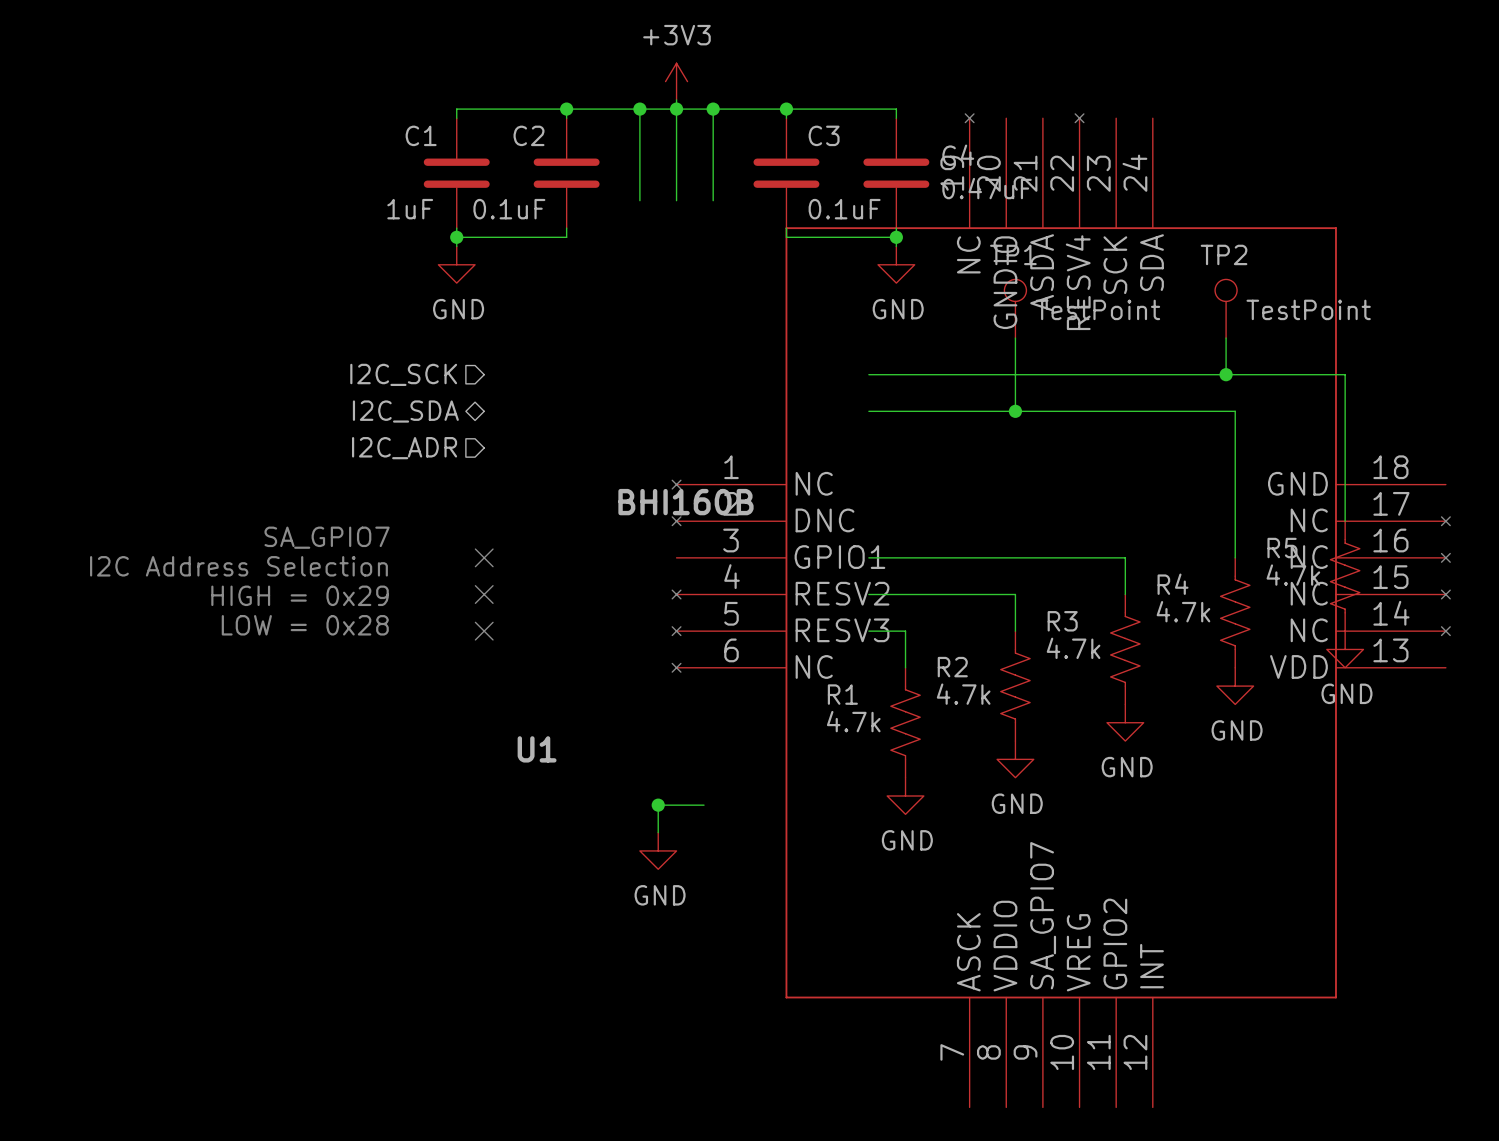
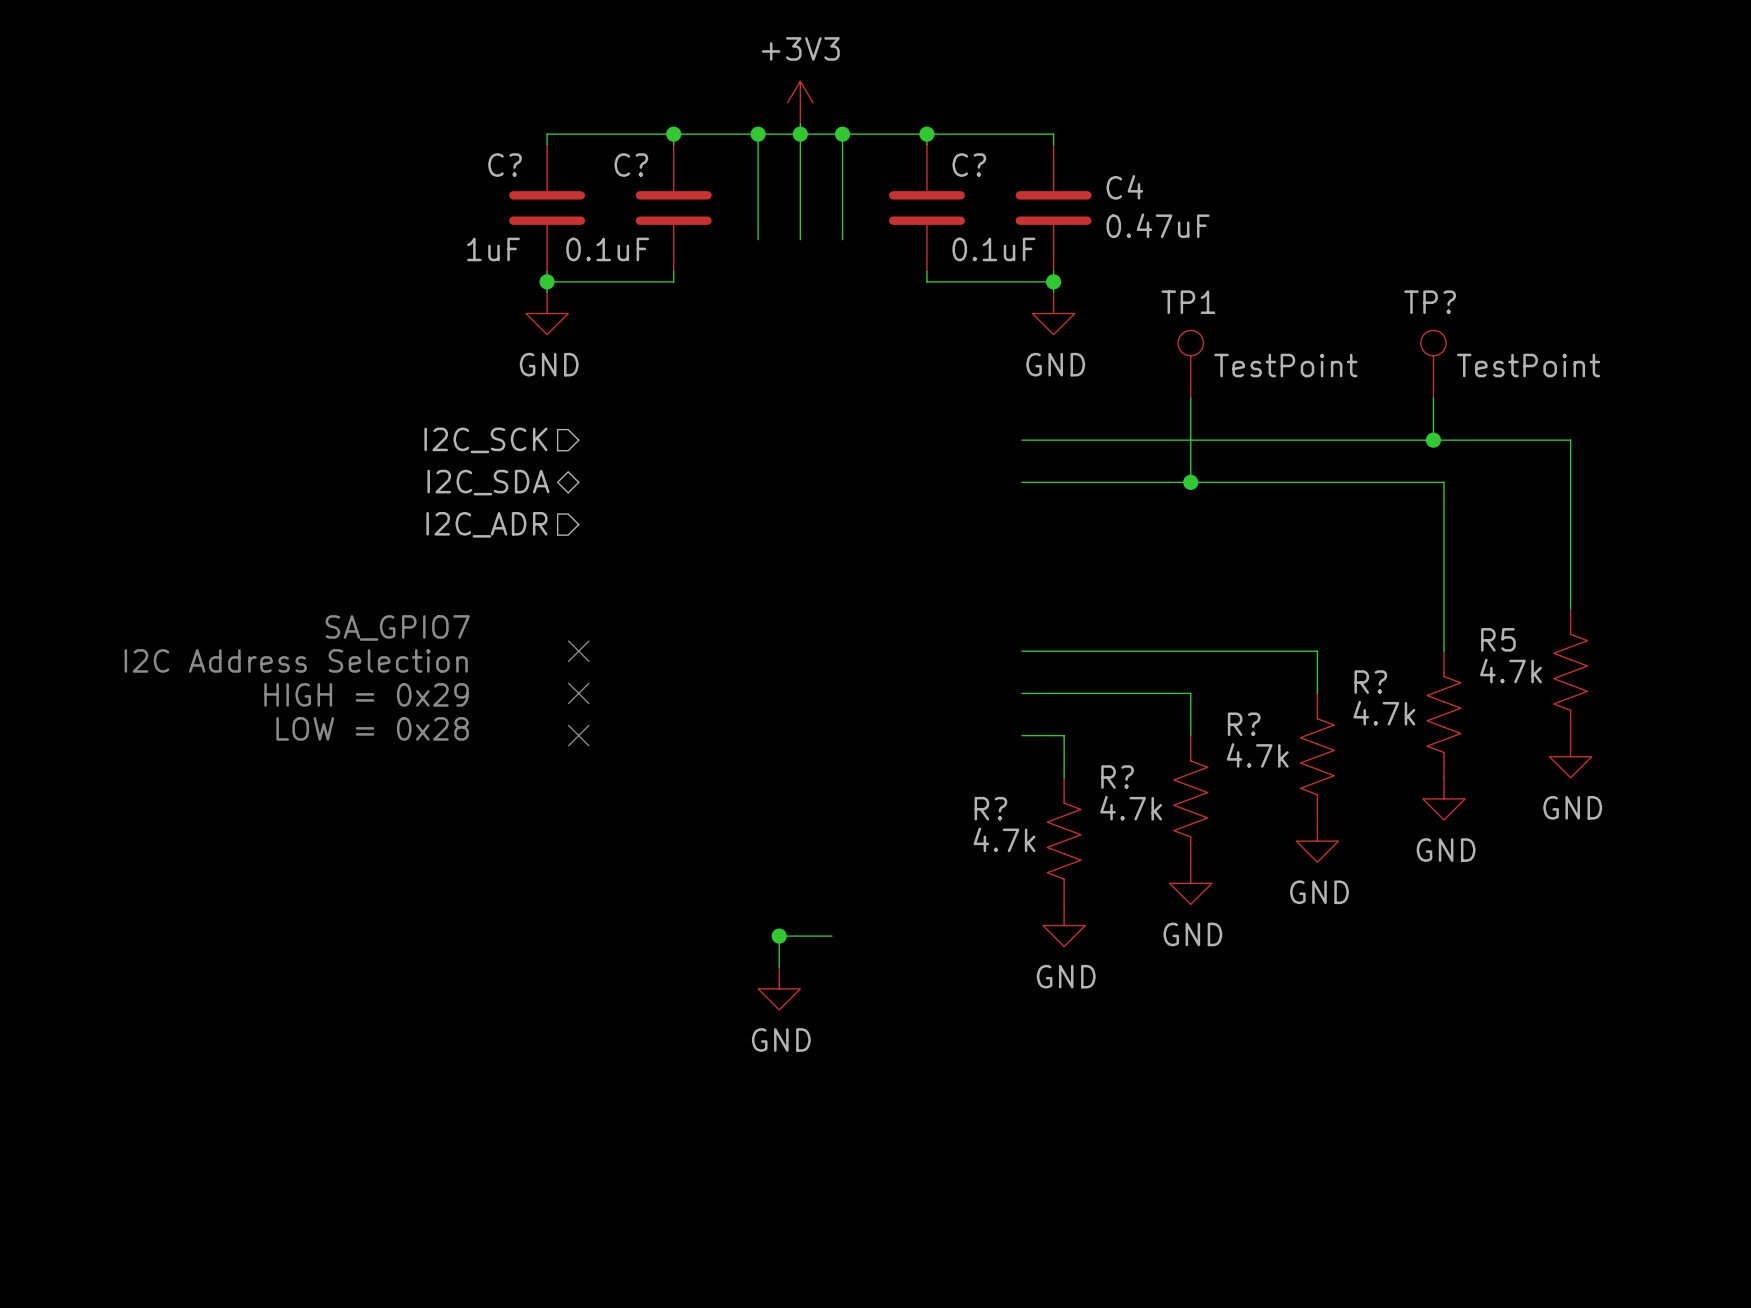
C1 name: C1 (421, 135) -> C? (505, 165)
C2 name: C2 (528, 135) -> C? (631, 165)
C3 name: C3 (824, 135) -> C? (969, 165)
TP2 name: TP2 (1224, 254) -> TP? (1430, 302)
R4 name: R4 (1173, 584) -> R? (1370, 682)
U1: BHI160B (1061, 610) -> none
R3 name: R3 (1062, 621) -> R? (1244, 724)
R2 name: R2 (952, 667) -> R? (1117, 777)
R1 name: R1 (842, 694) -> R? (990, 808)

